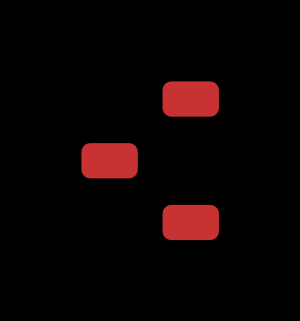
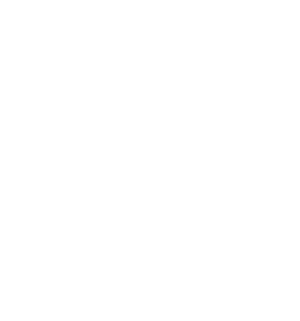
part: (150, 160) -> none

